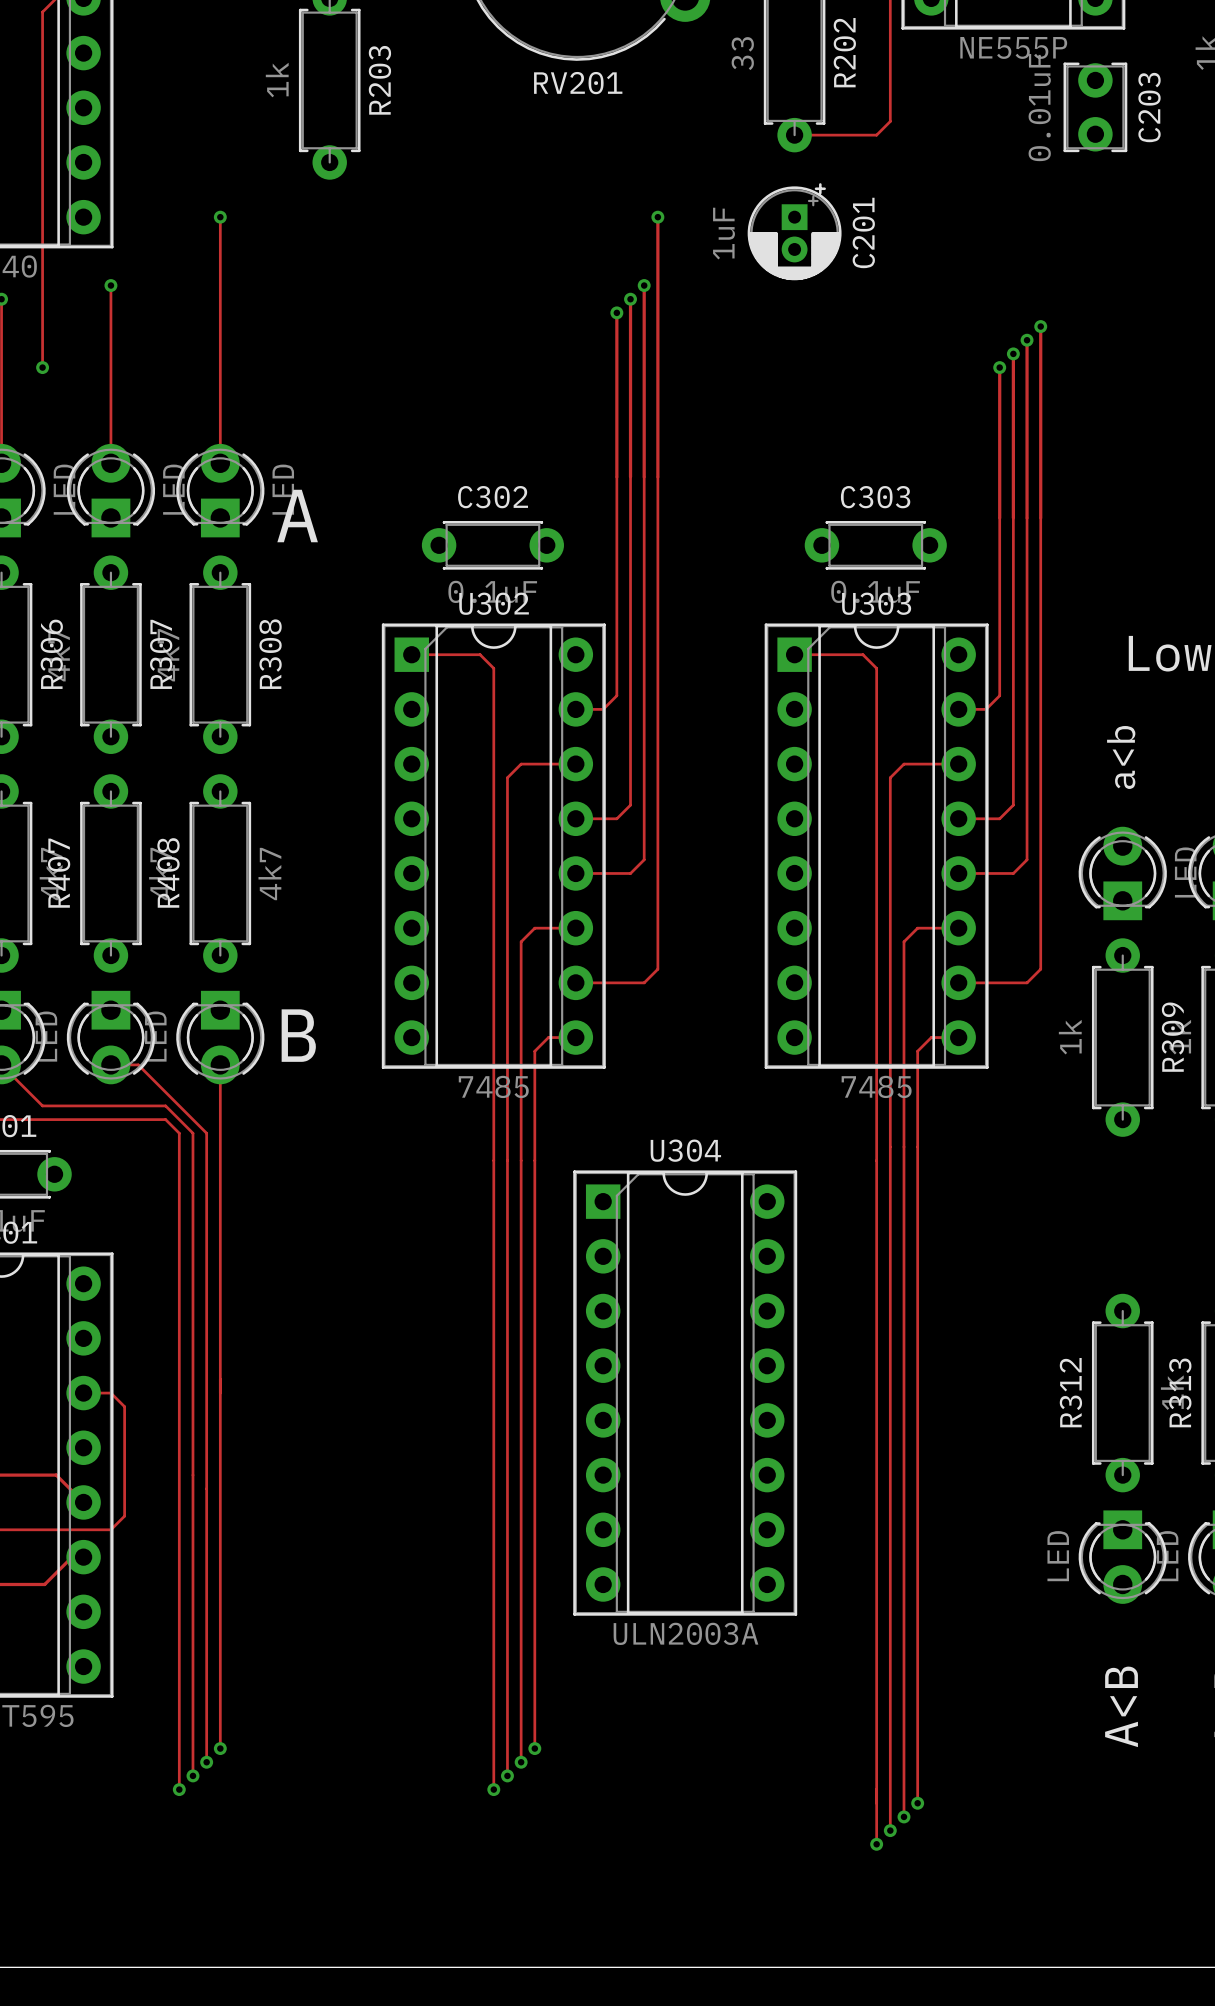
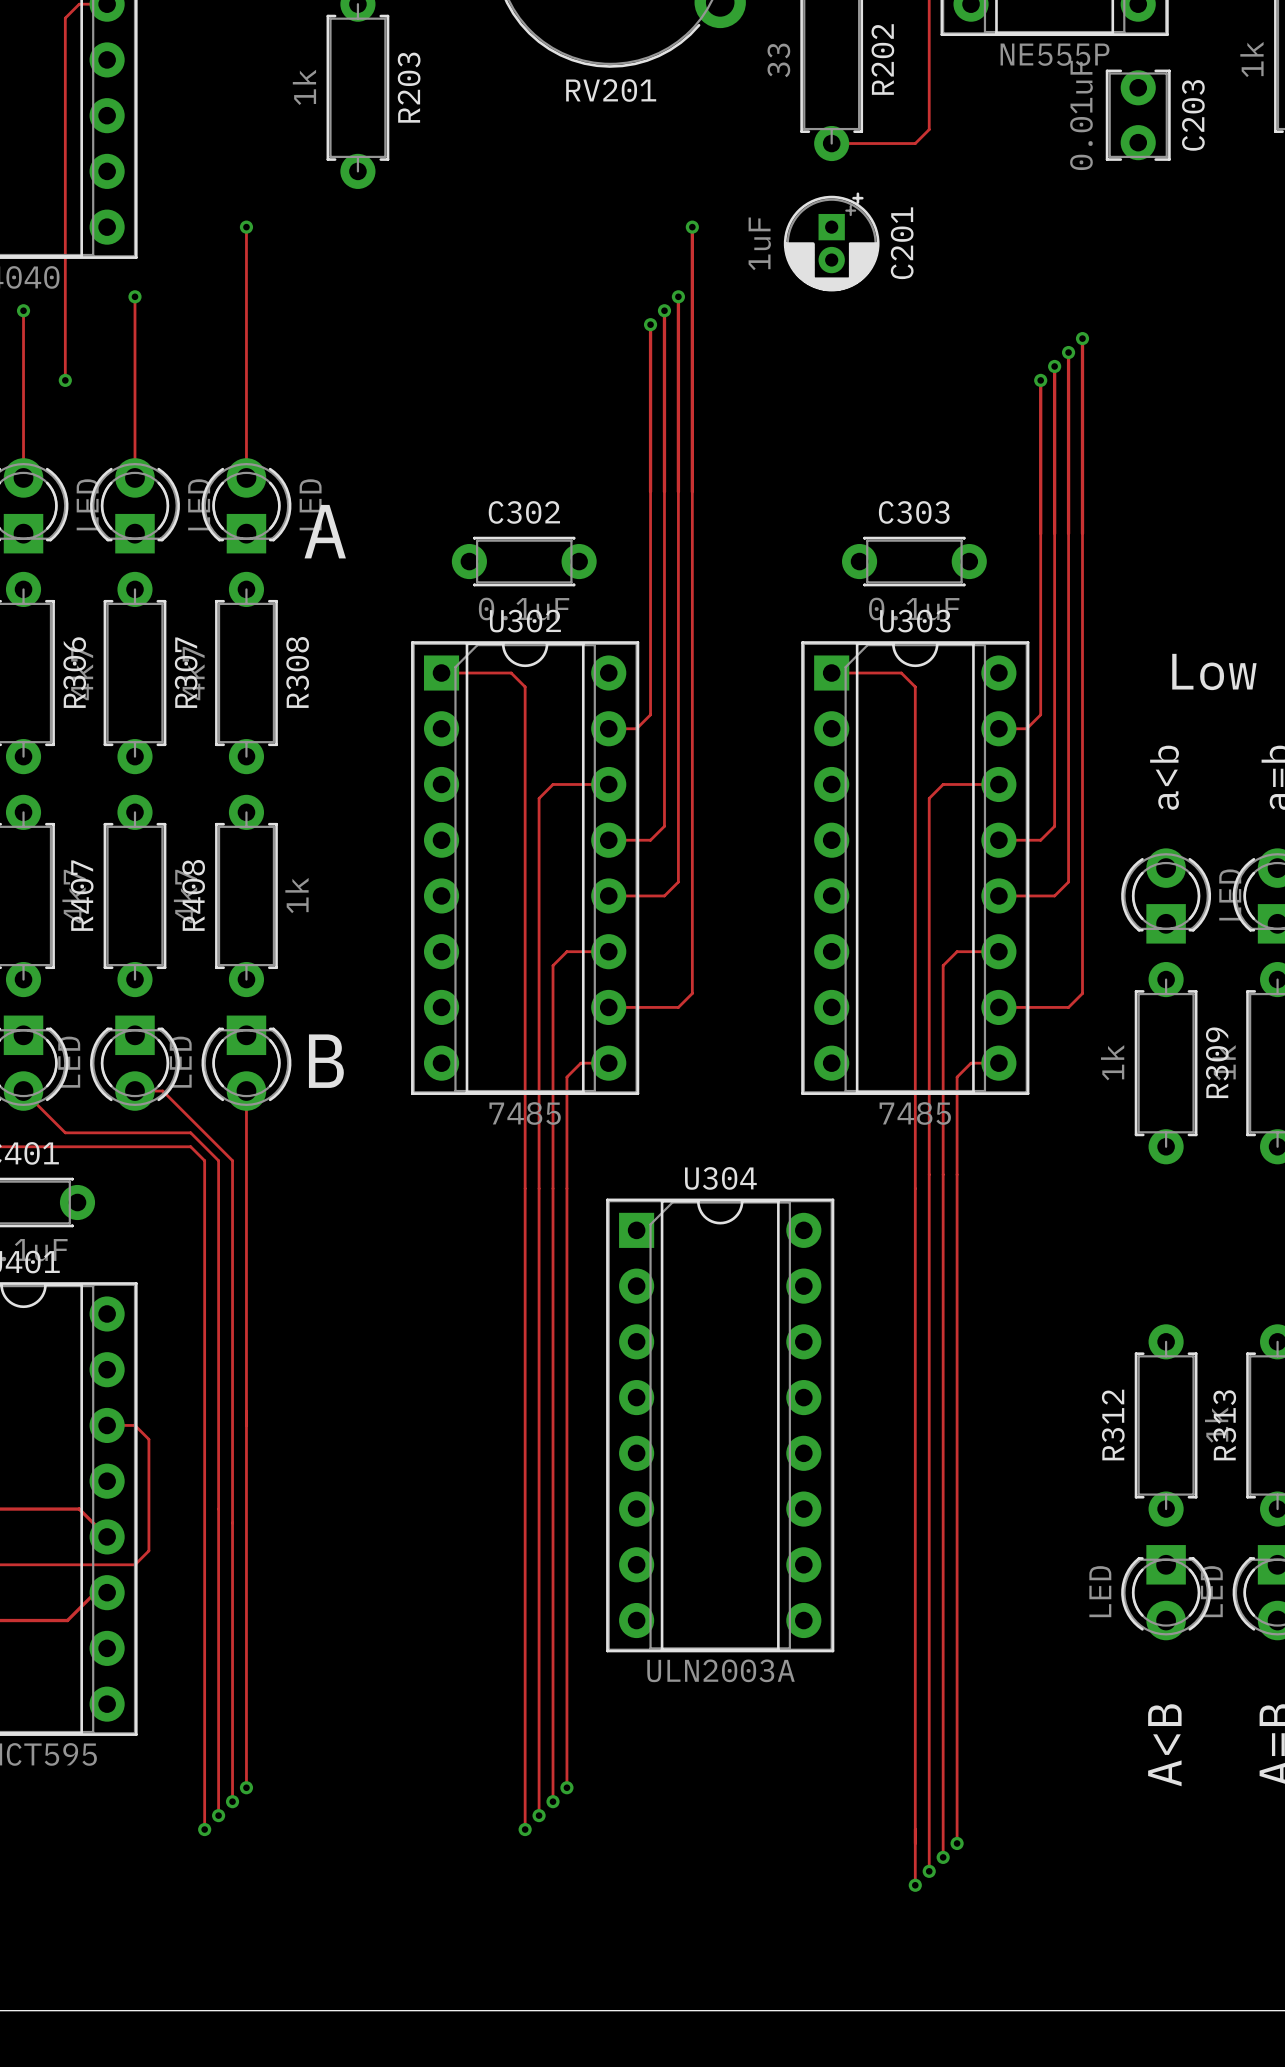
R408 value: 4k7 (269, 874) -> 1k (296, 895)

